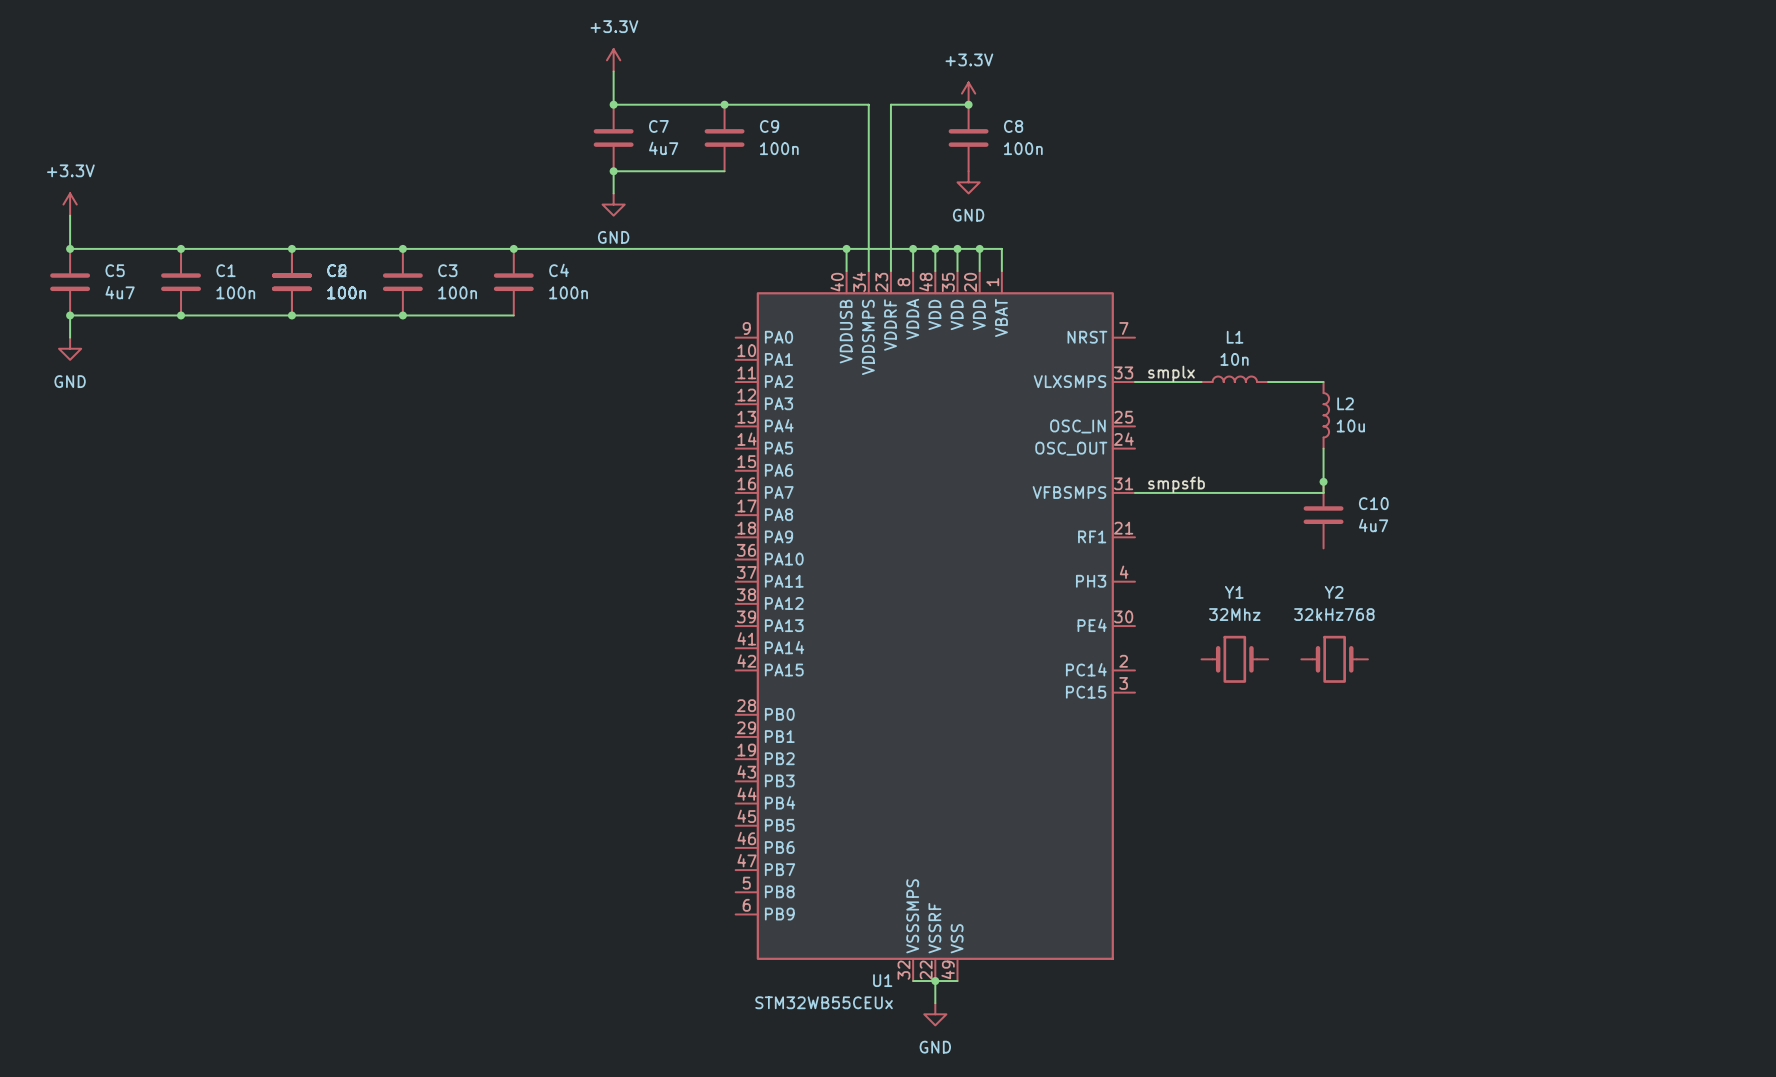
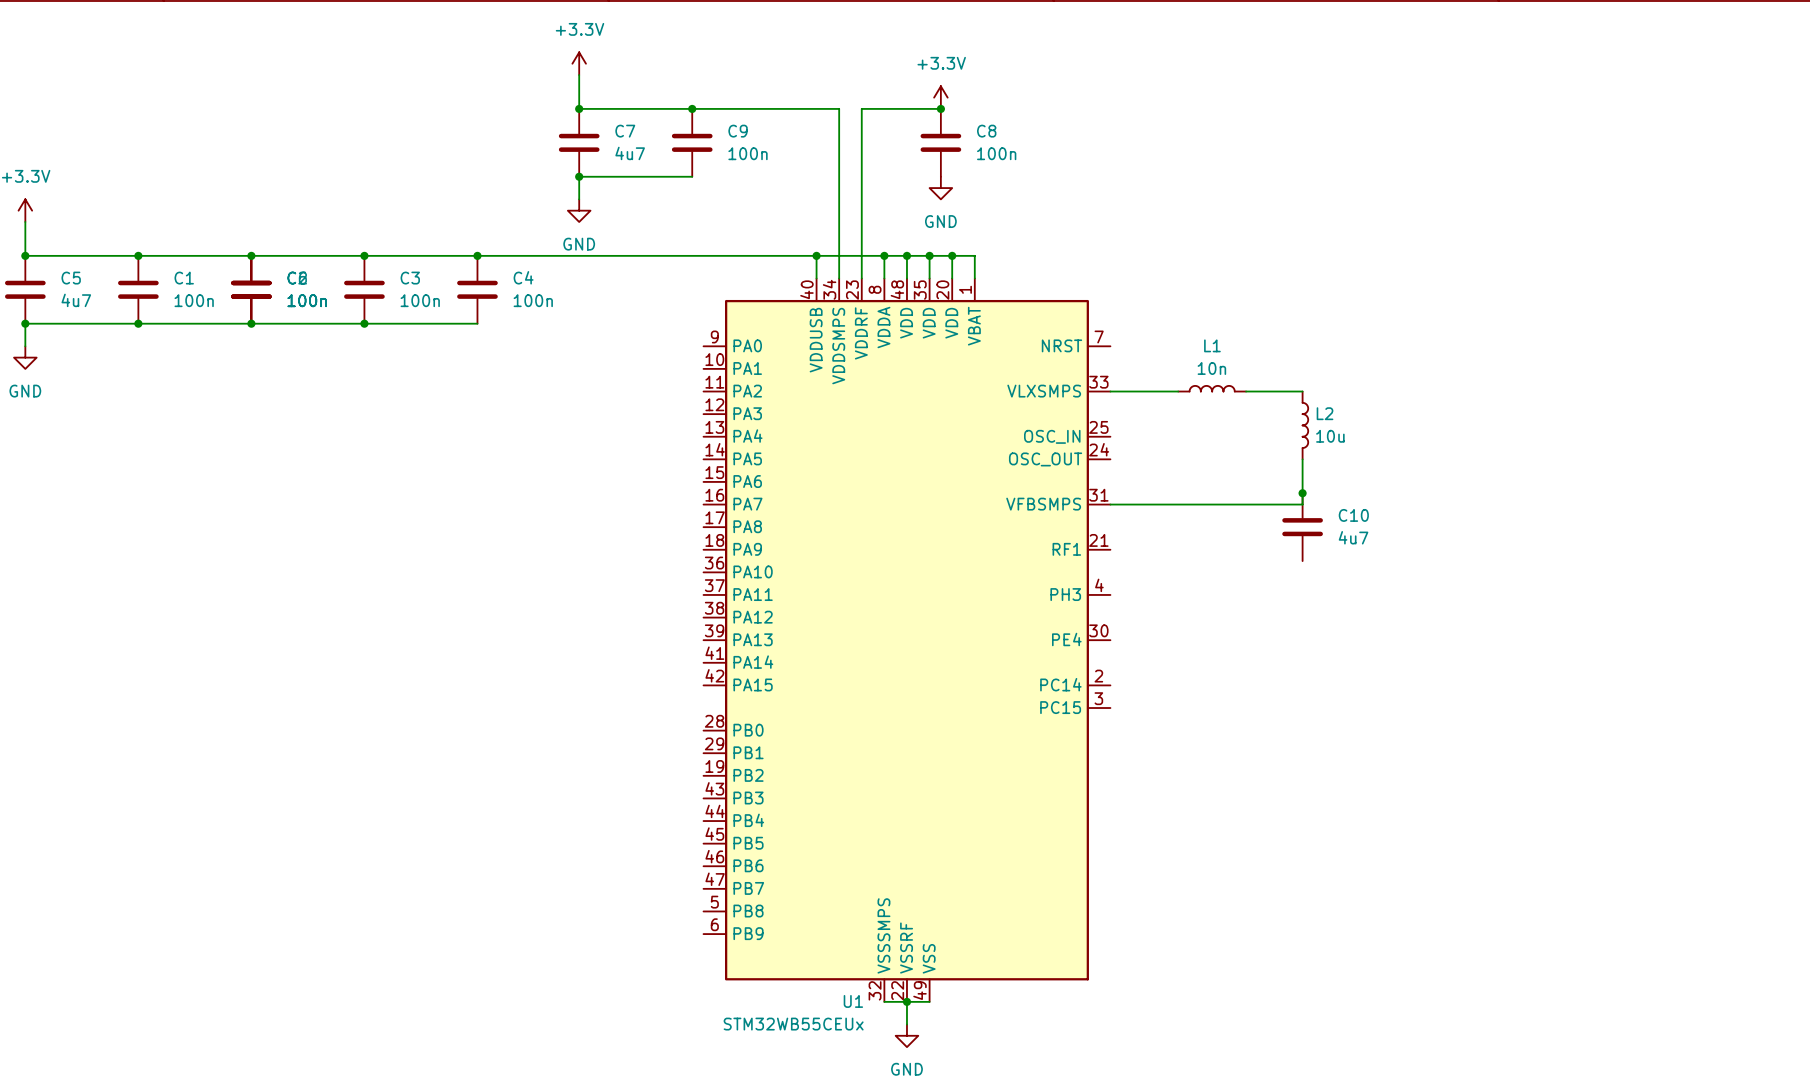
label: smplx (1171, 373) -> none
label: smpsfb (1176, 484) -> none
Y1: 32Mhz (1234, 659) -> none
Y2: 32kHz768 (1334, 659) -> none

